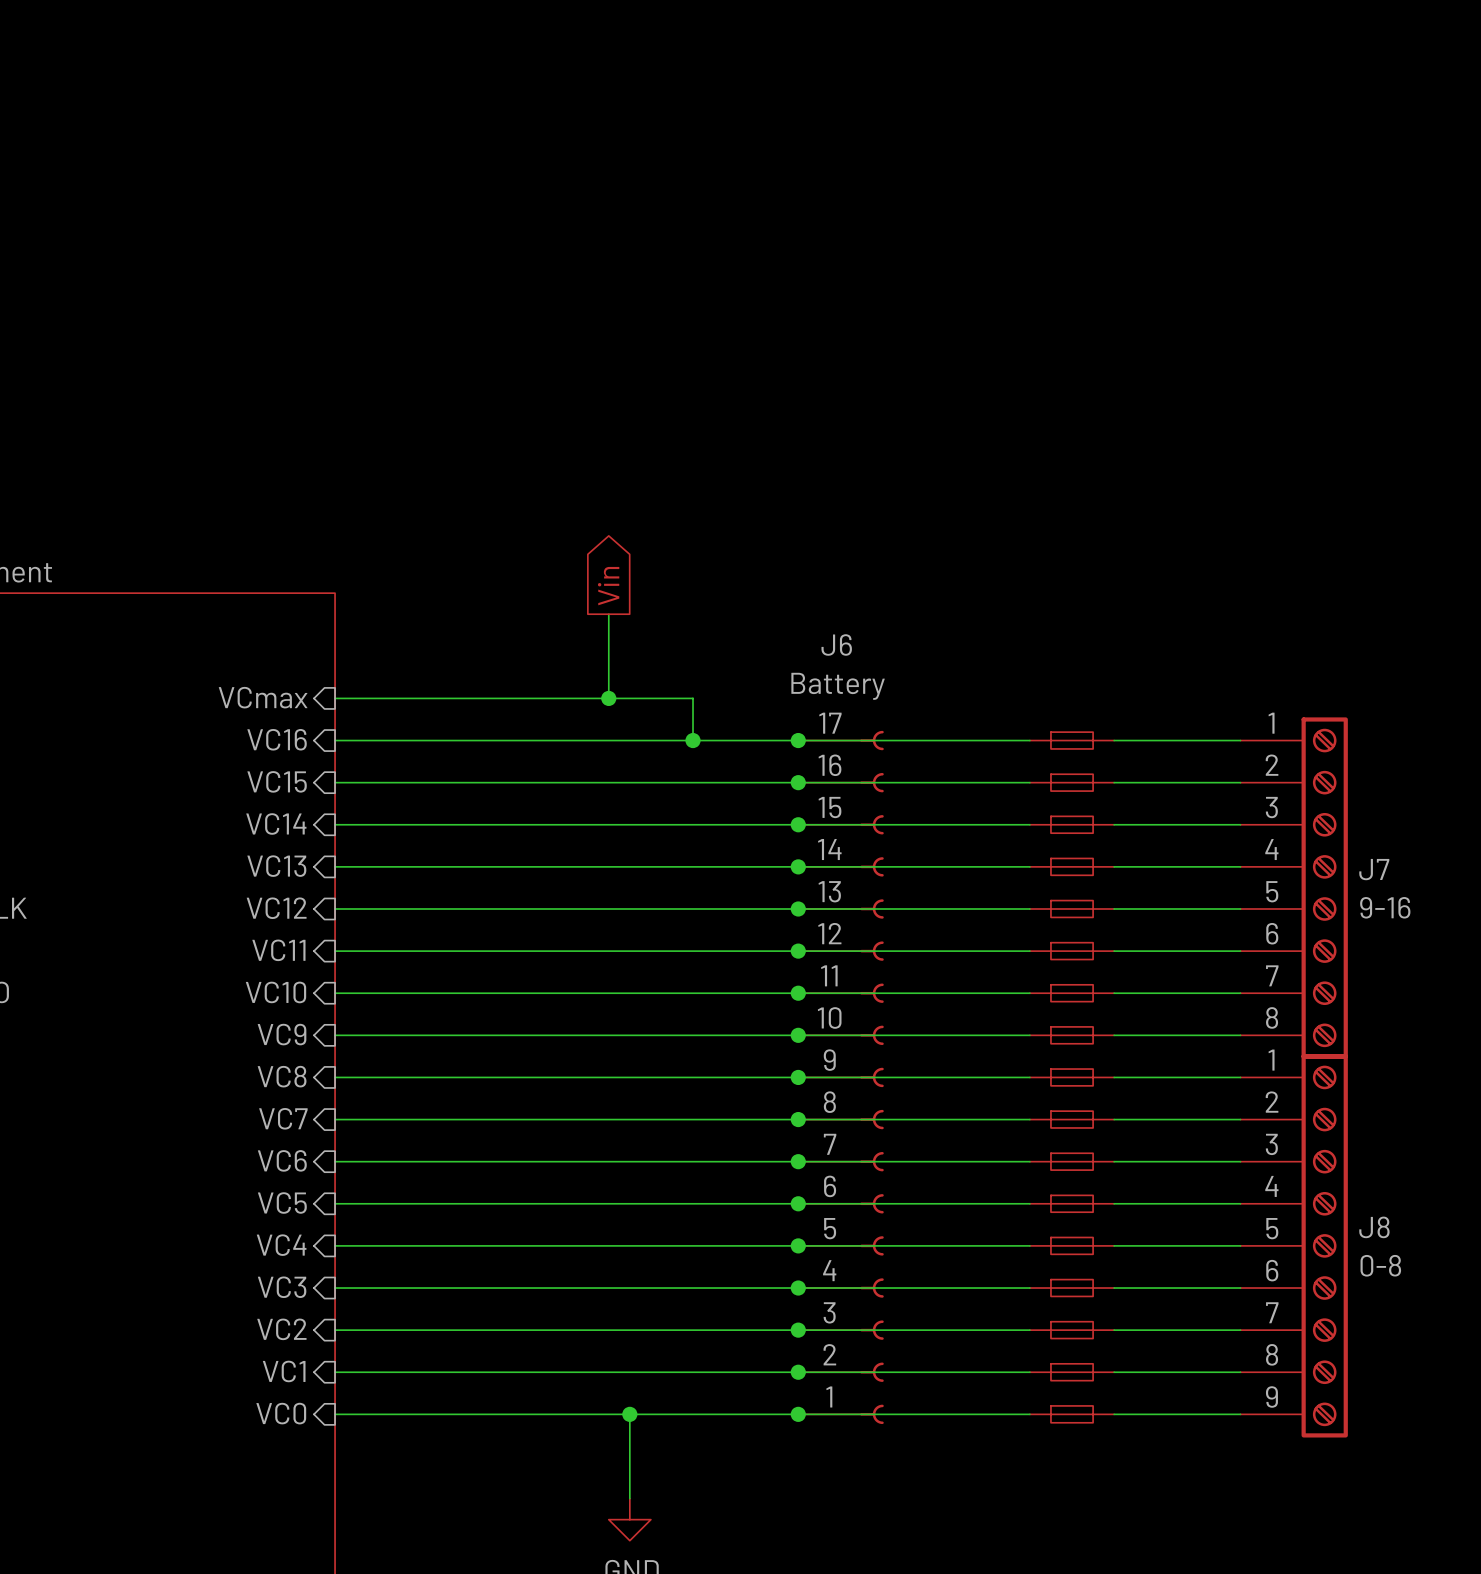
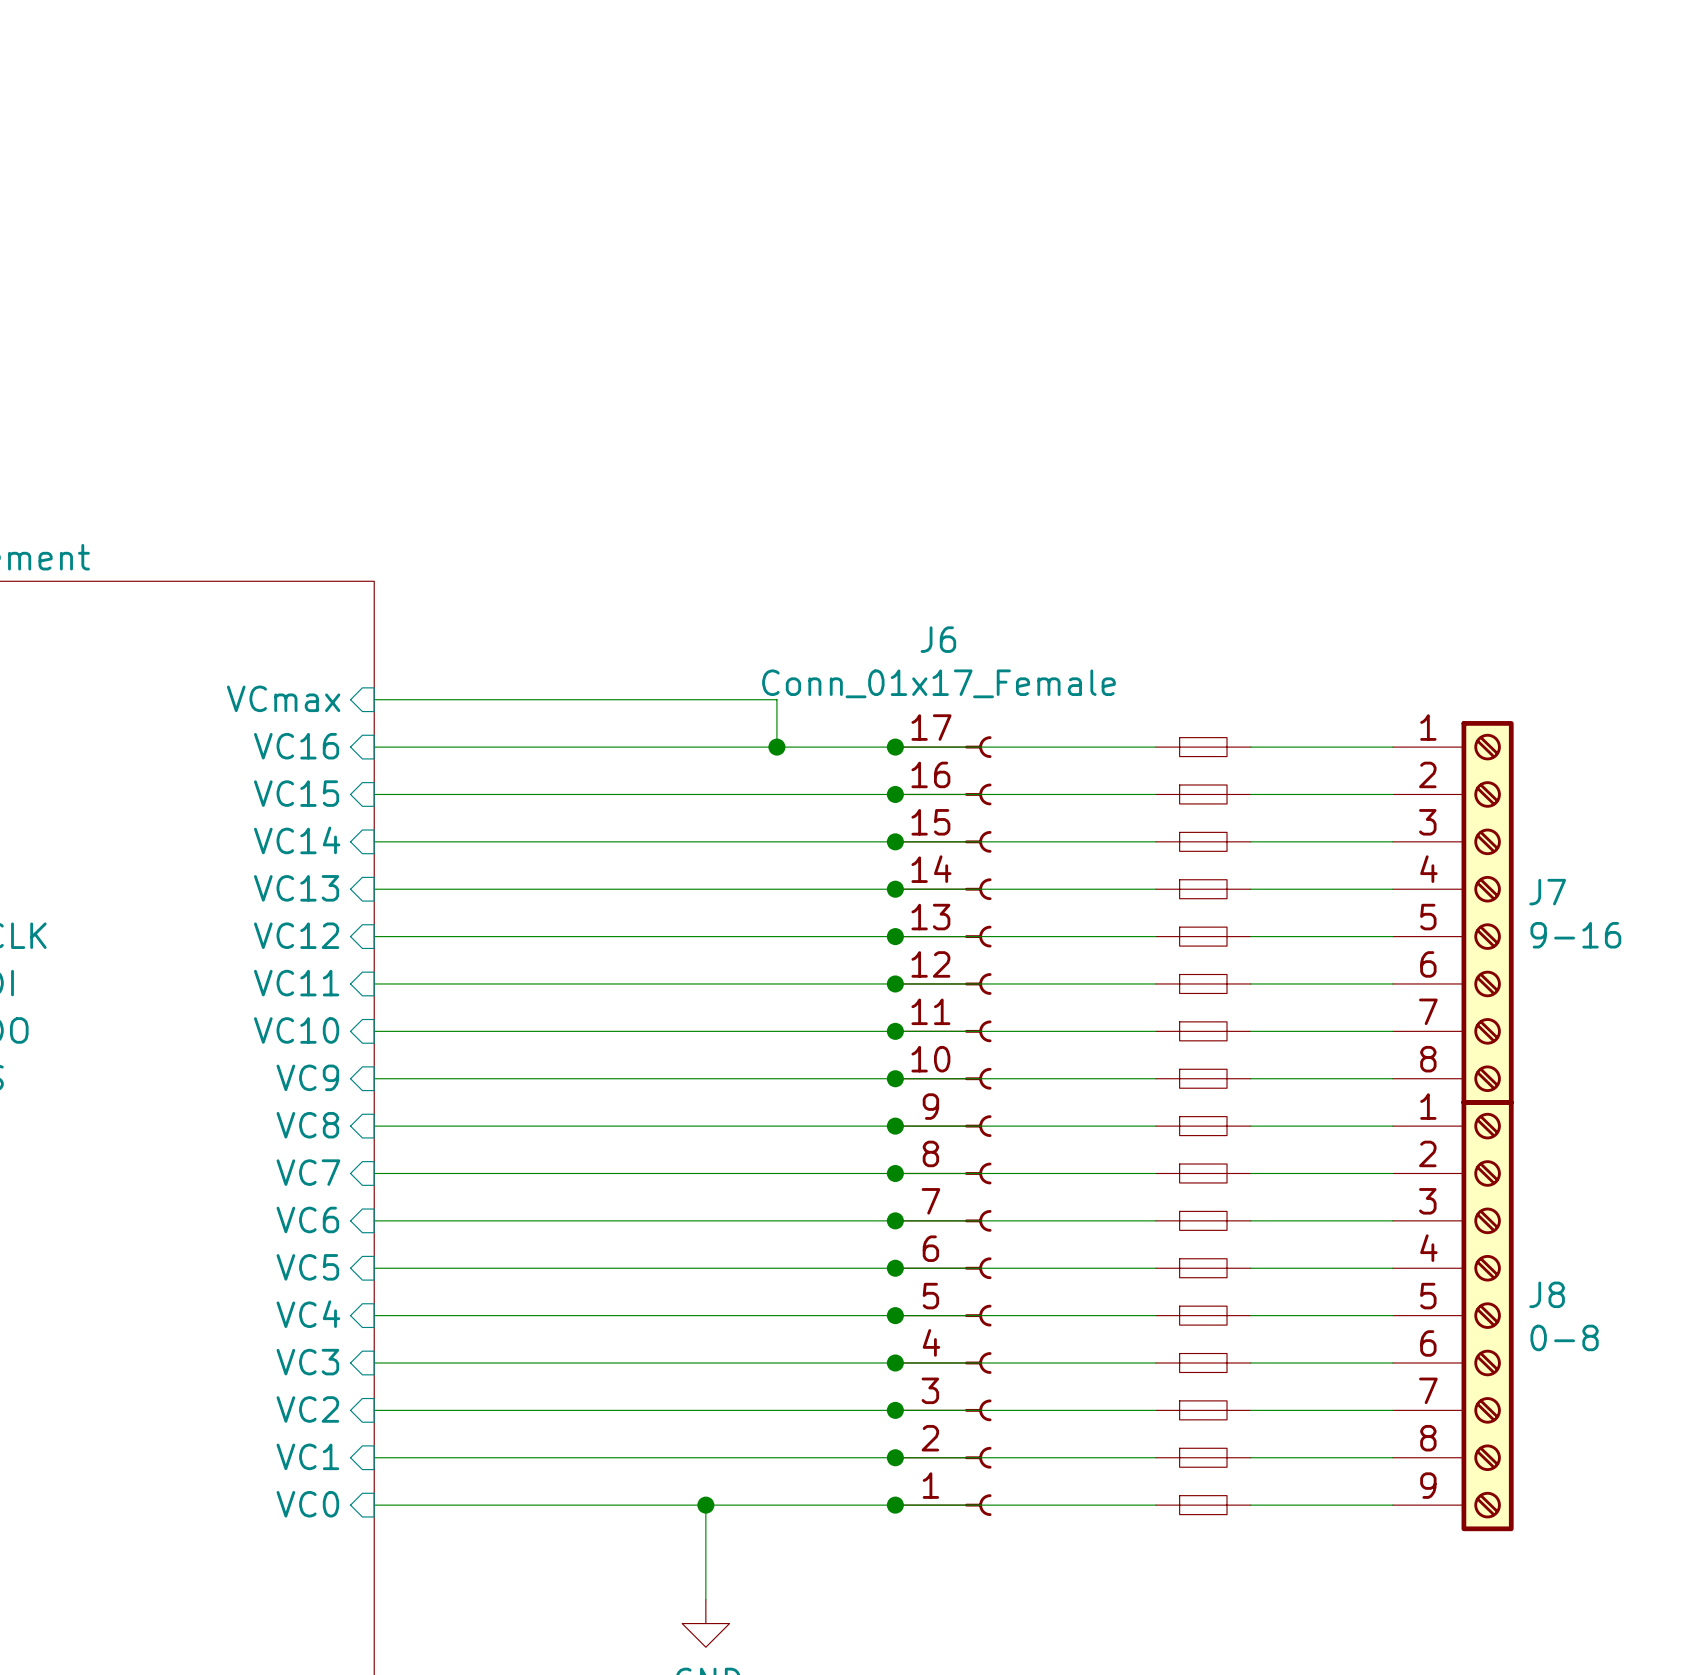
global label: Vin (608, 586) -> none
wire: (608, 614) (608, 698) -> none
J6 value: Battery (838, 686) -> Conn_01x17_Female (938, 683)
junction: (608, 698) -> none

